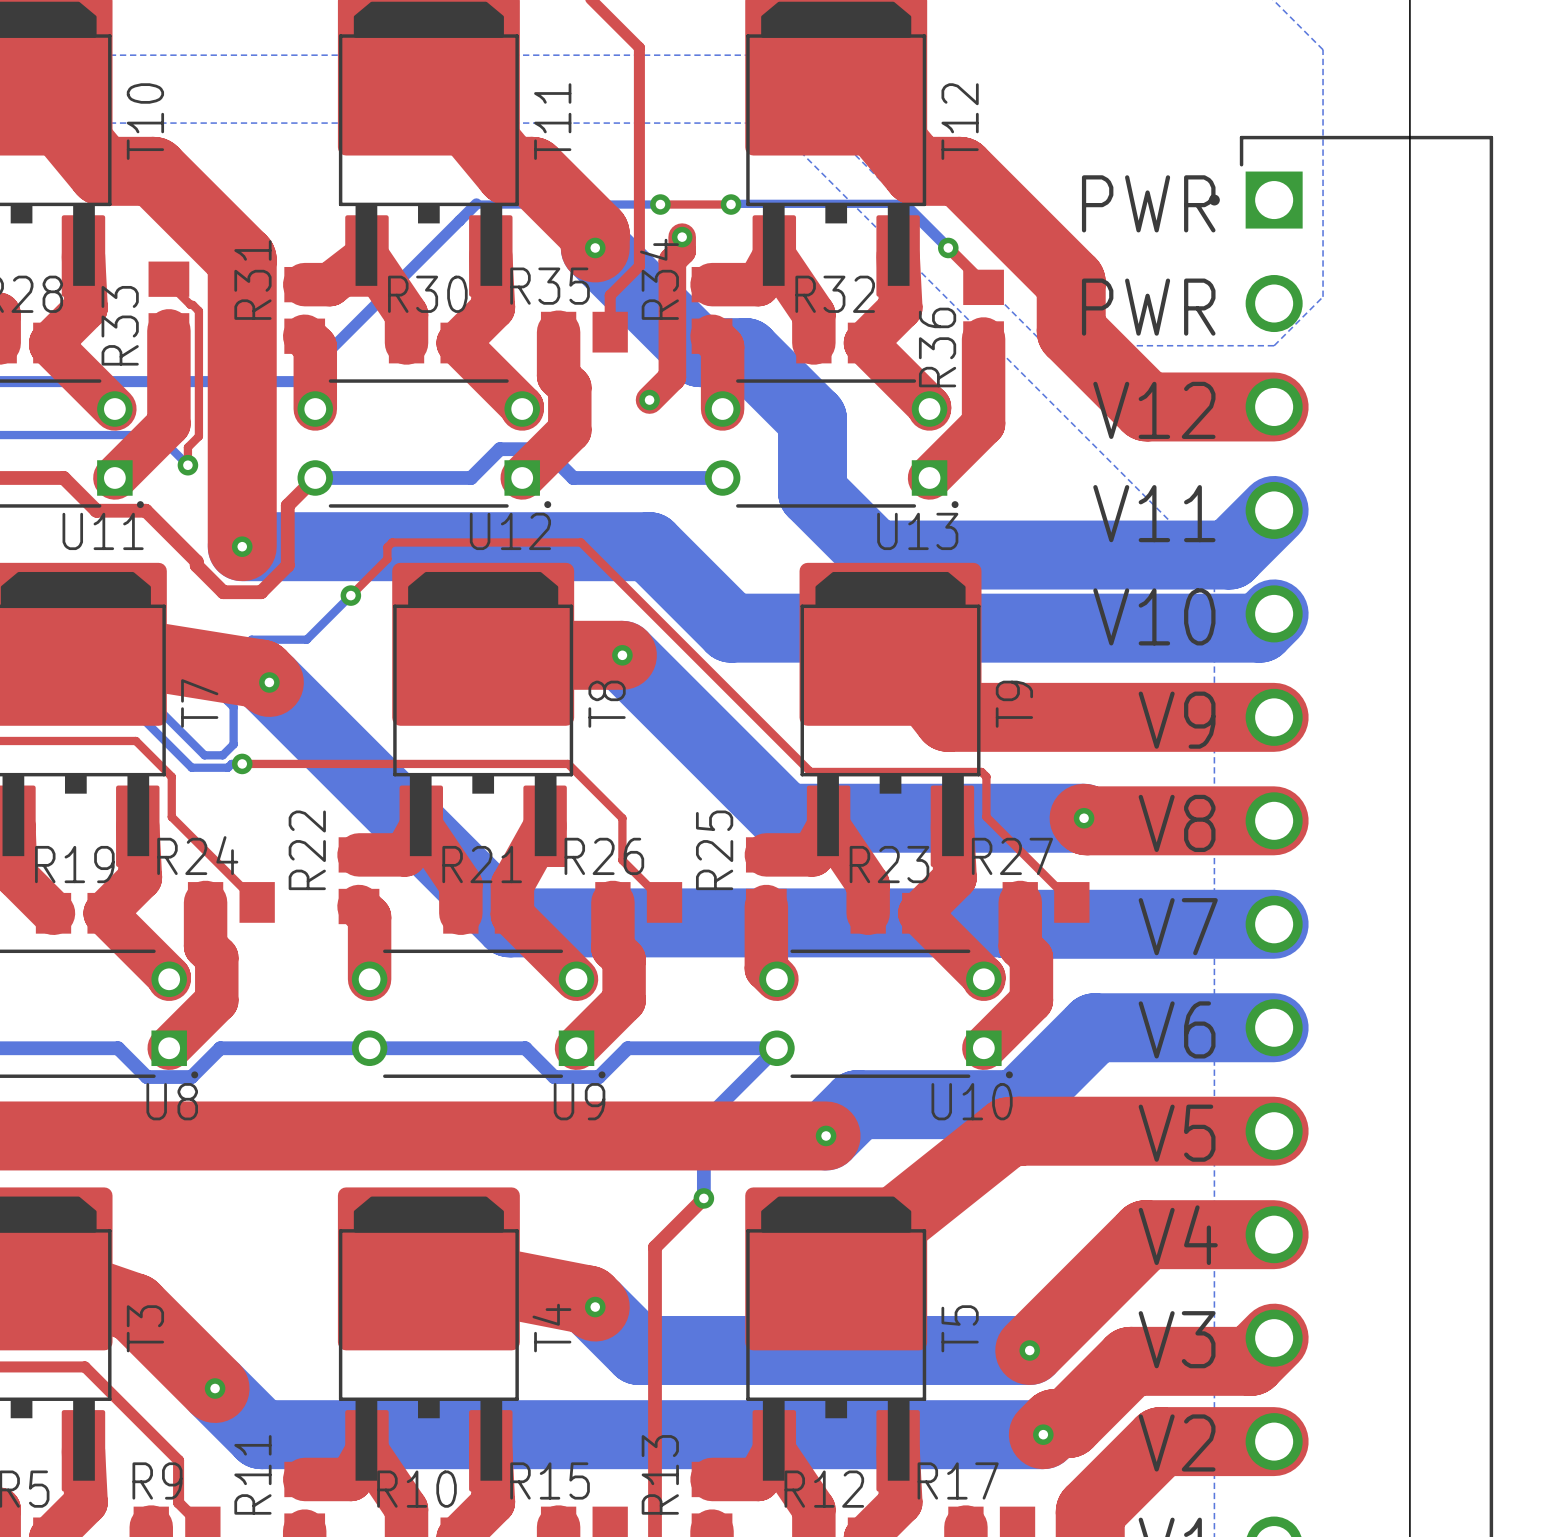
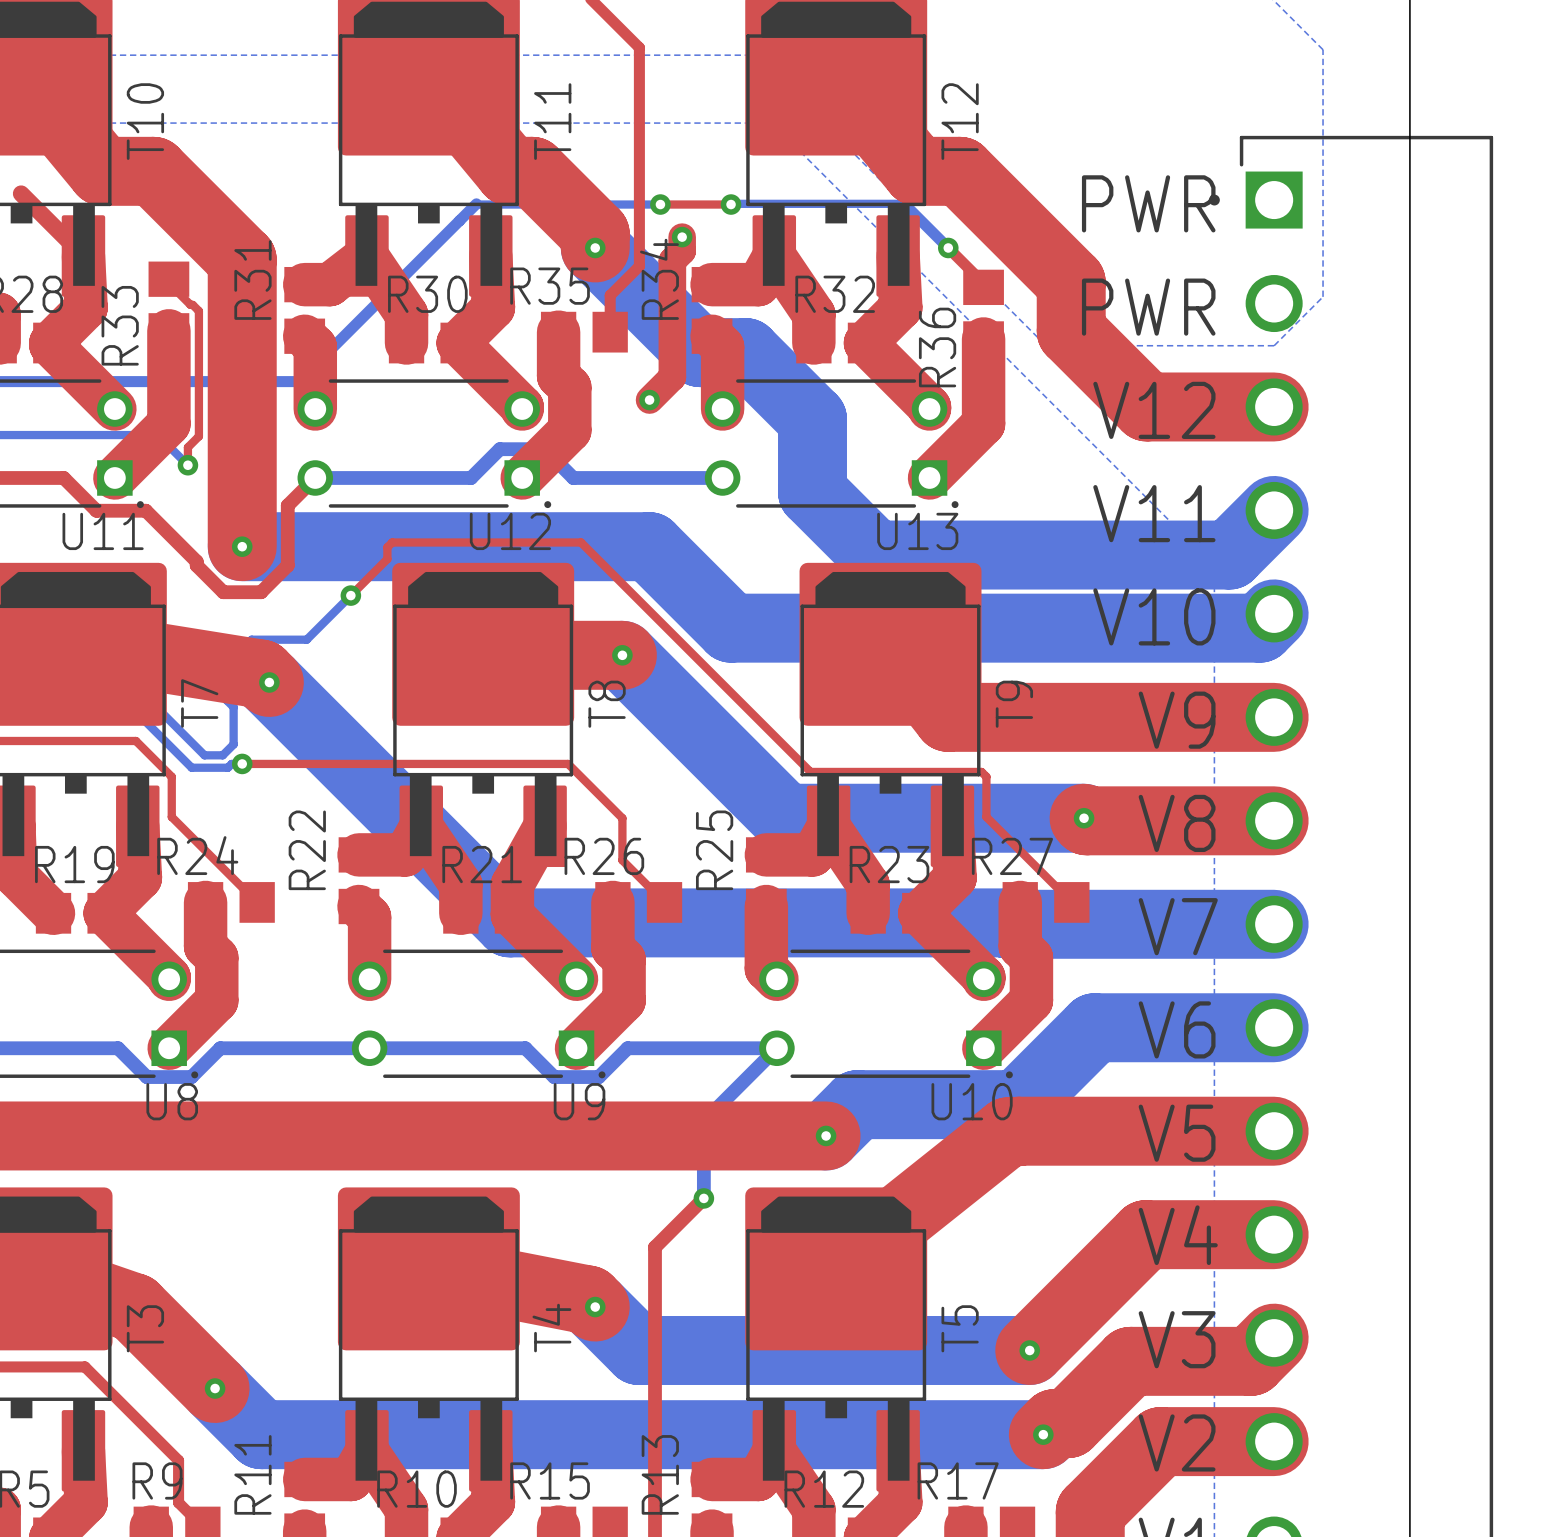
top track: none -> (21, 193) (83, 255)

